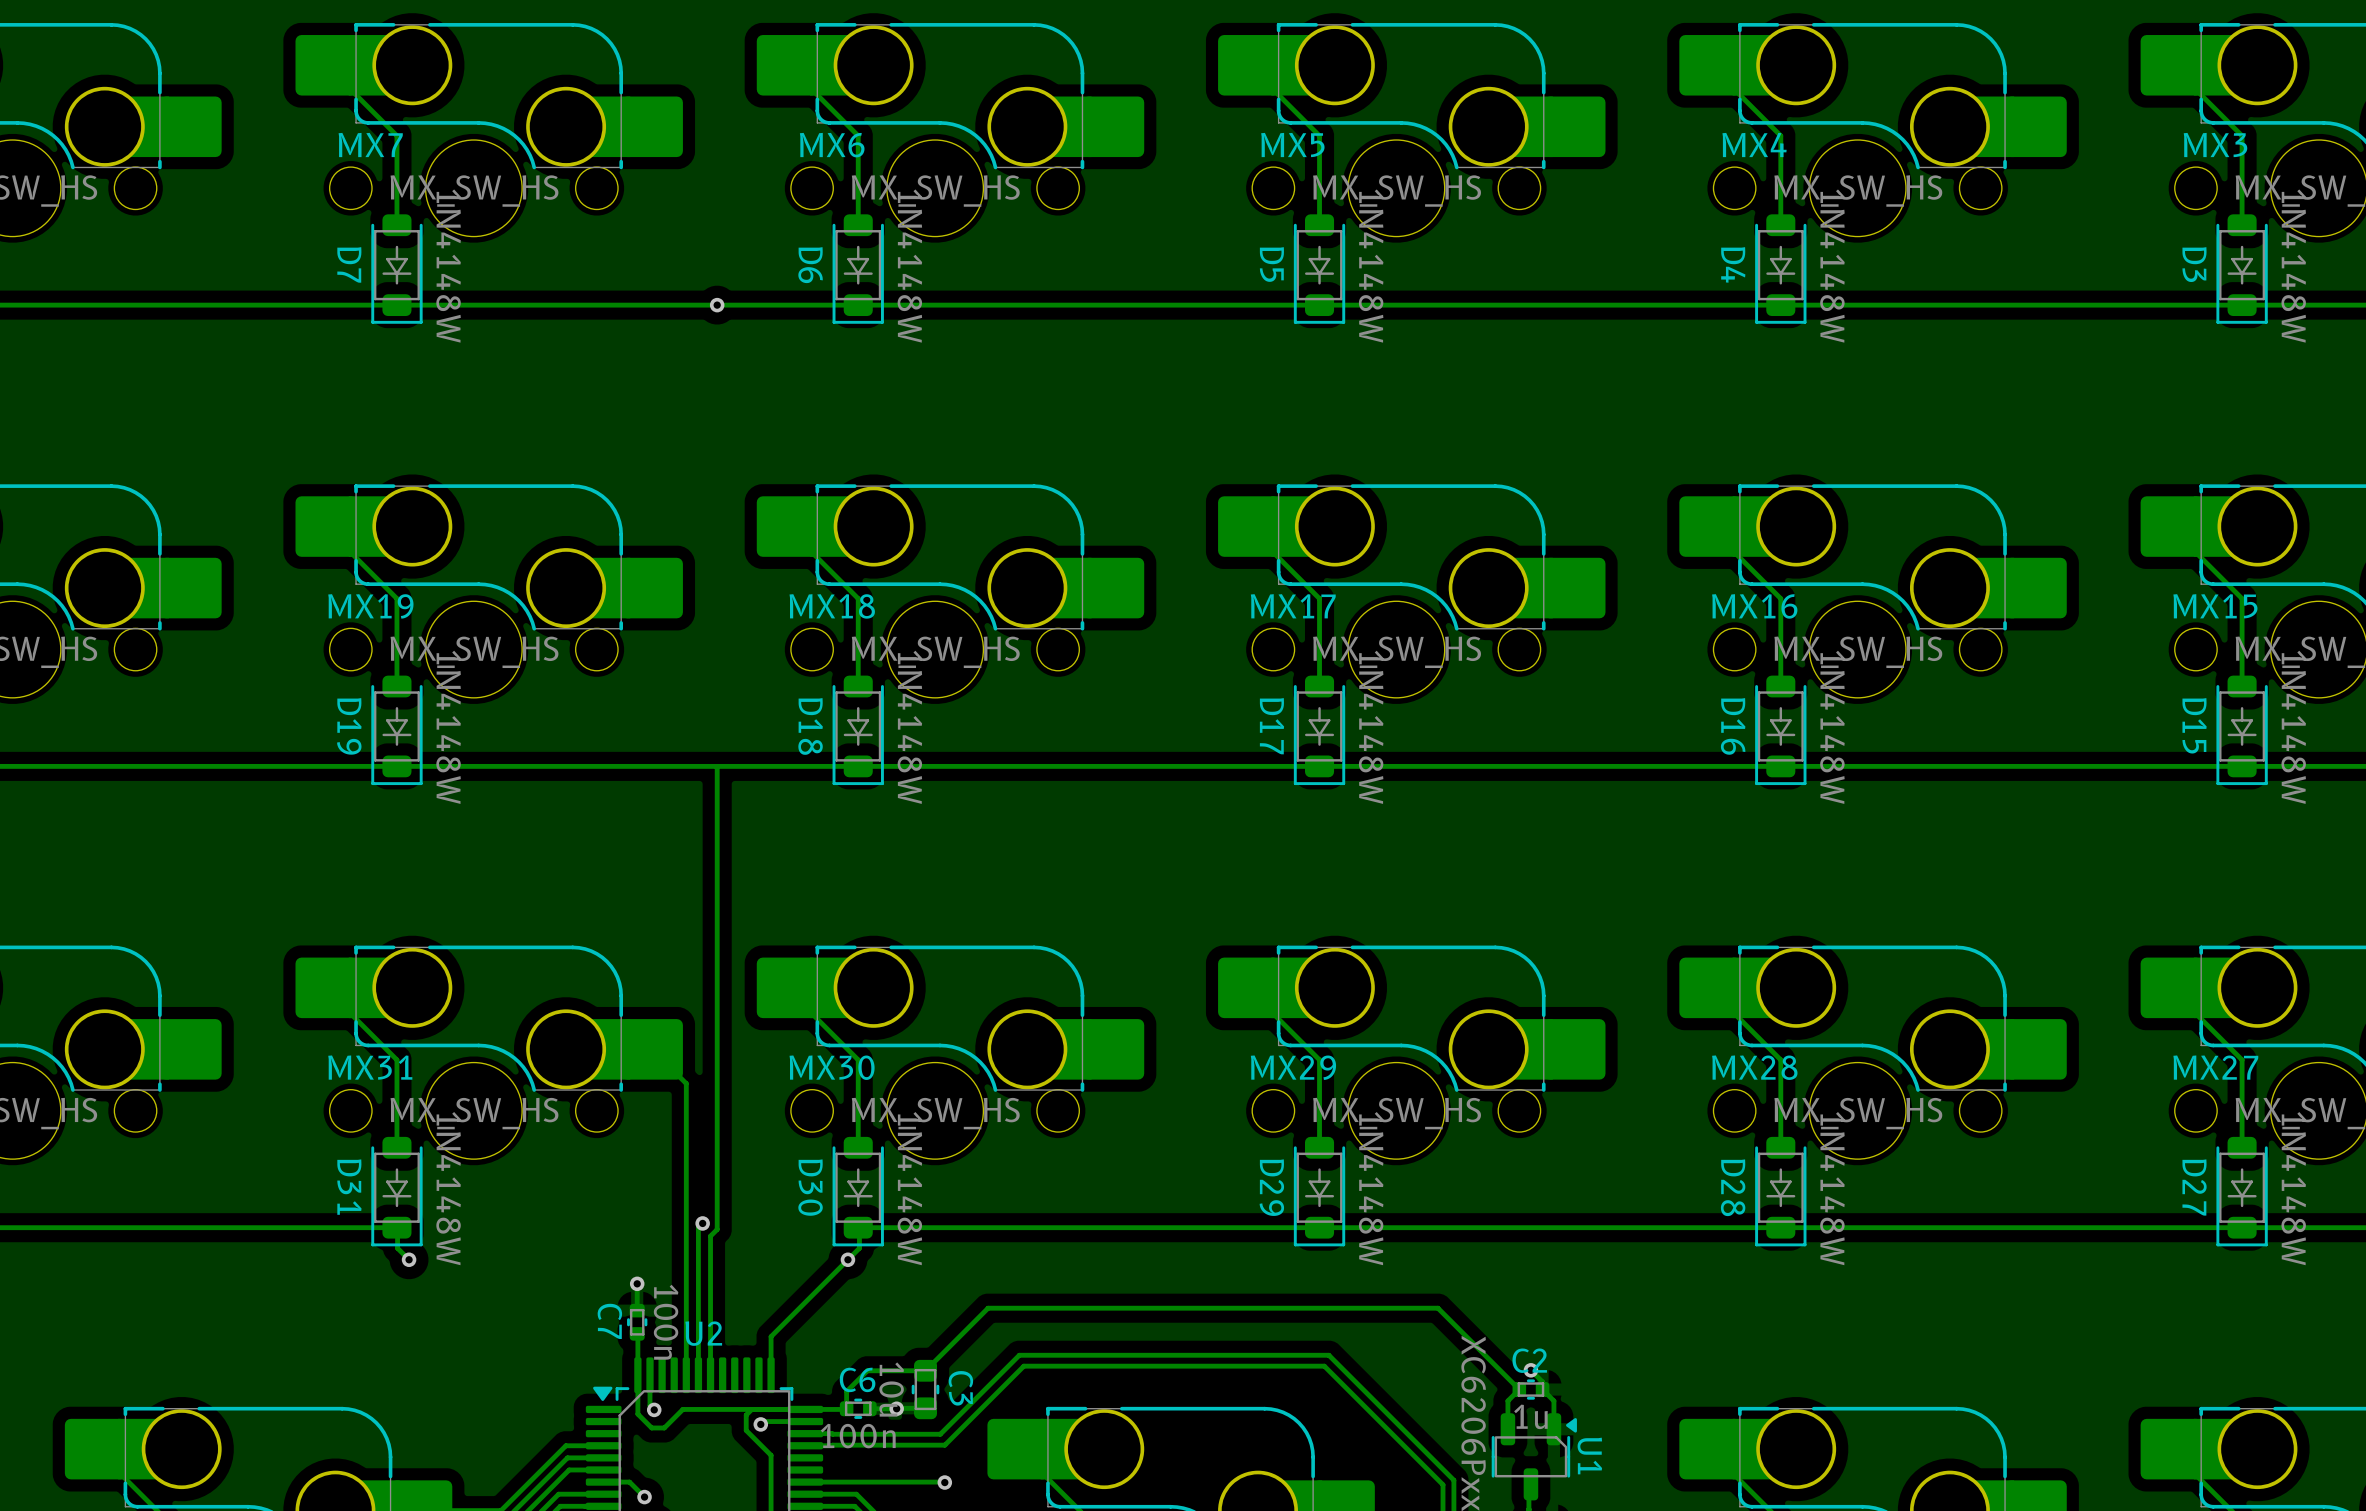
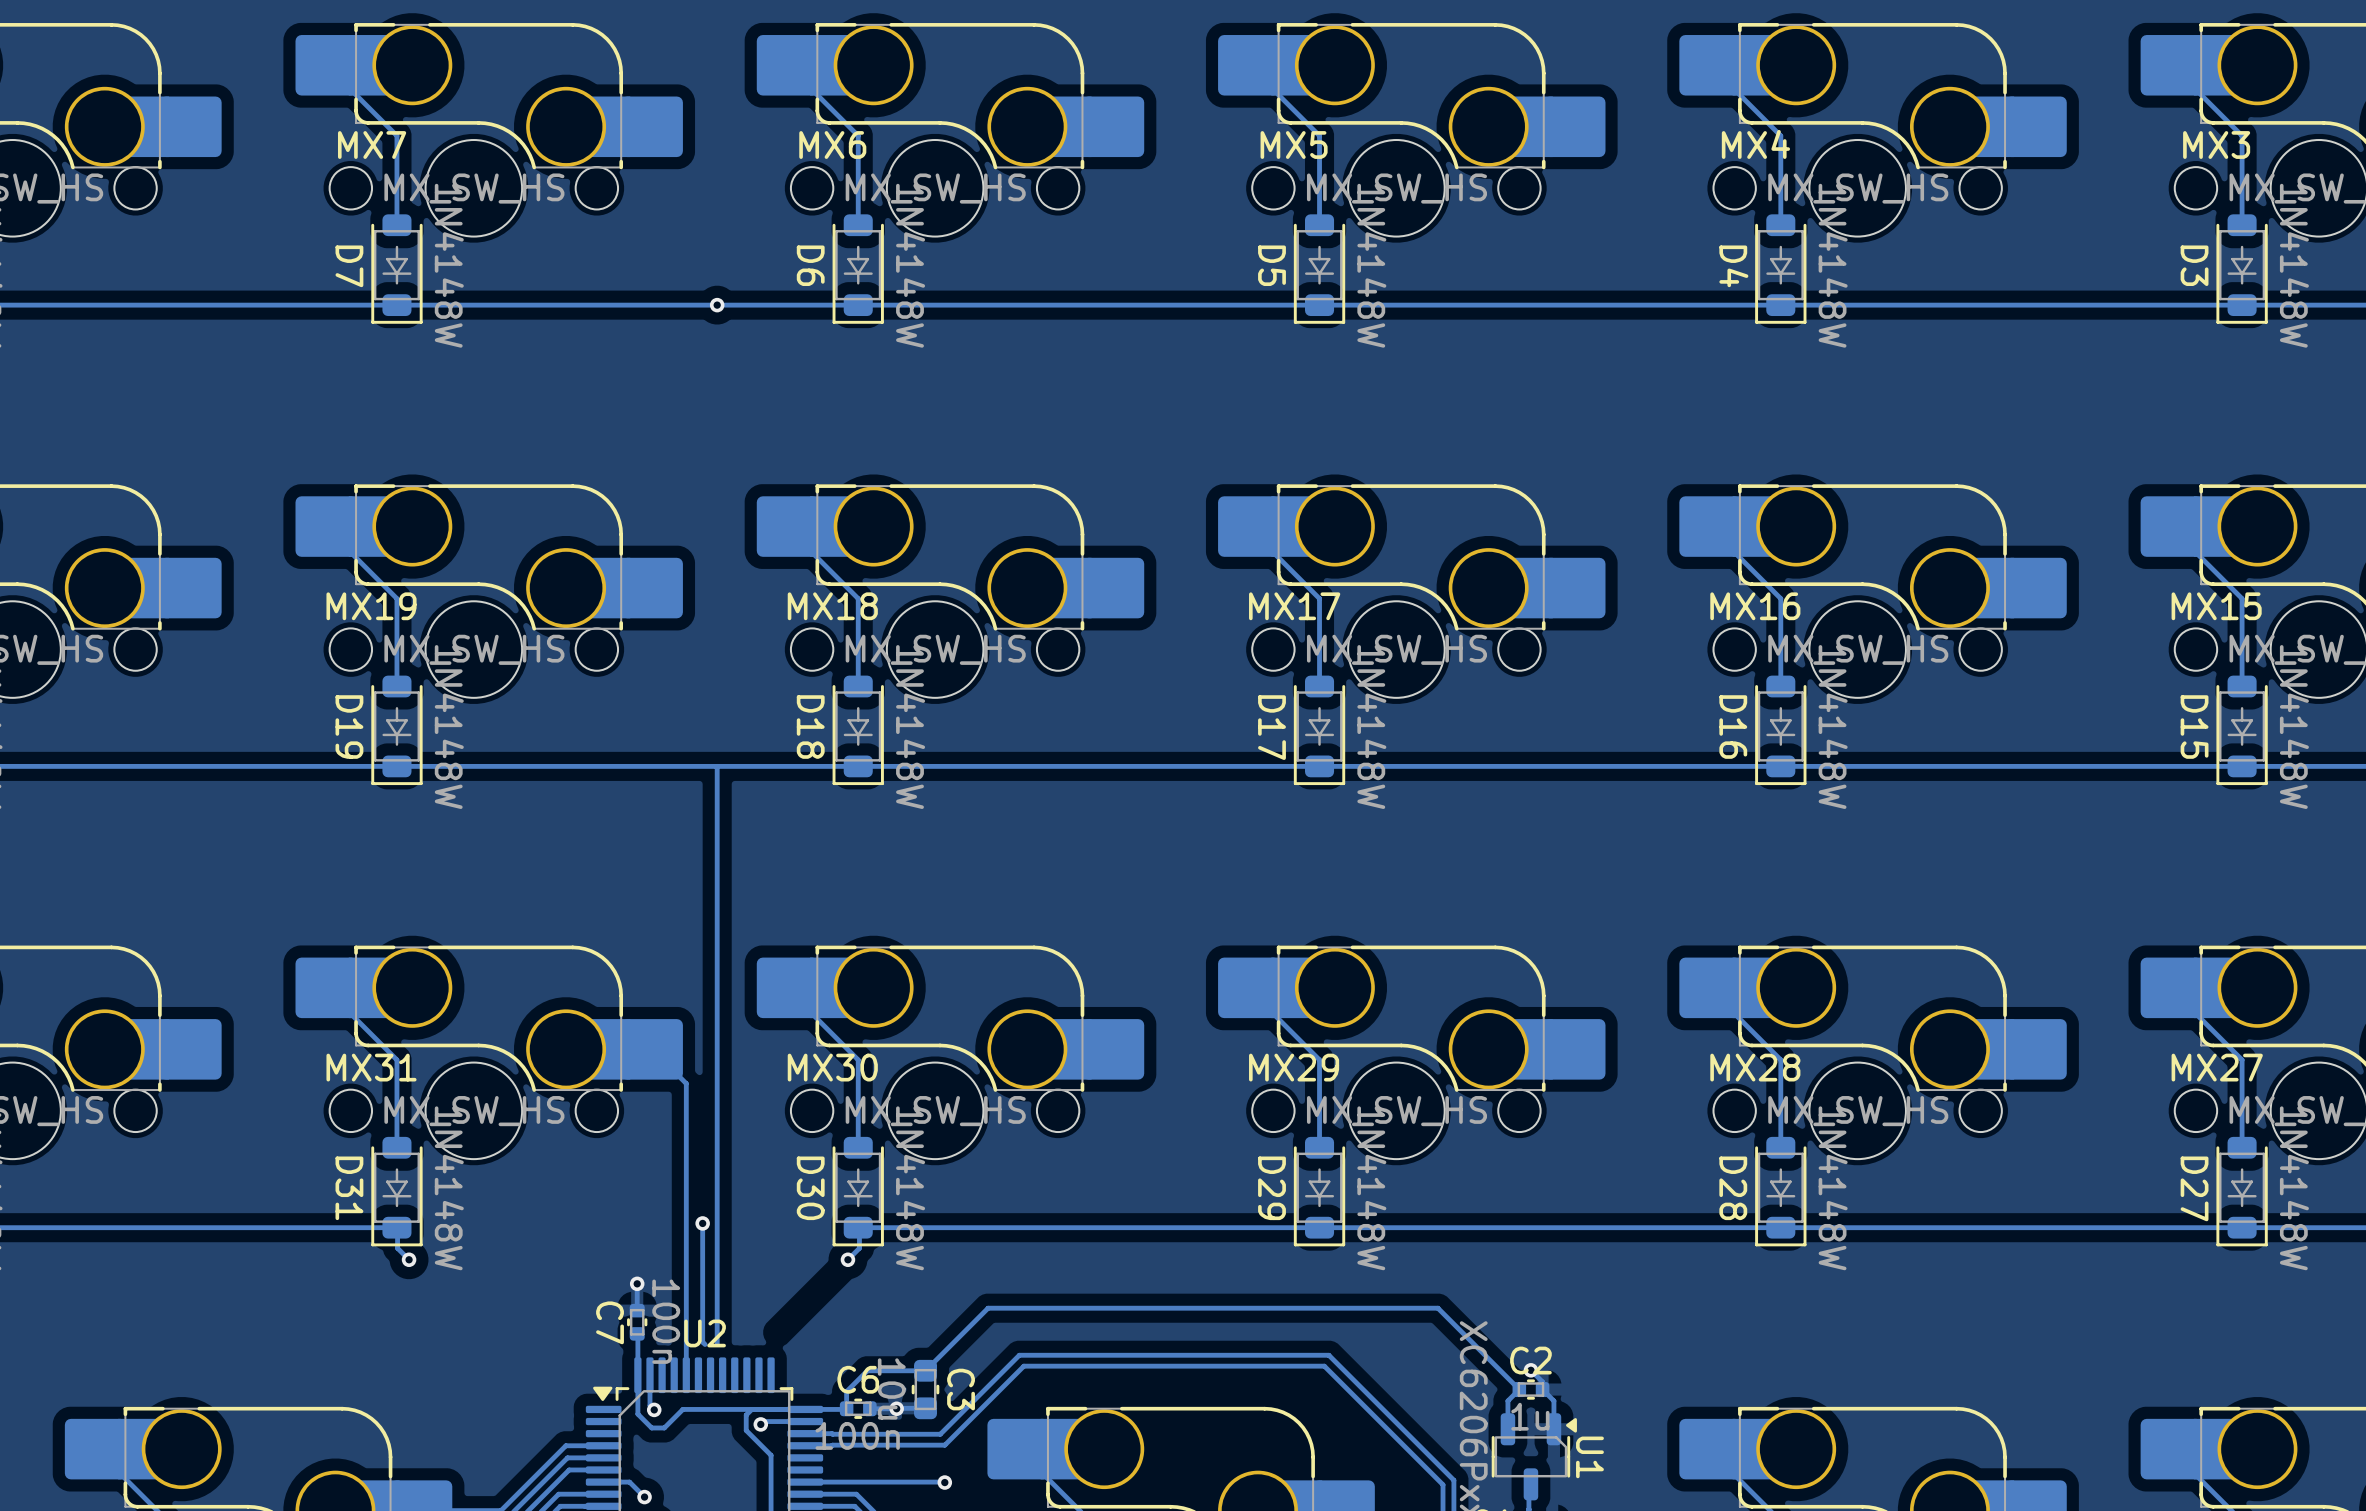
track: (702, 1223) (698, 1227) (698, 1375) -> (702, 1223) (702, 1342) (705, 1344)
track: (717, 1229) (710, 1236) (710, 1375) -> (717, 1229) (717, 1344)
track: (847, 1259) (771, 1336) (771, 1375) -> none

